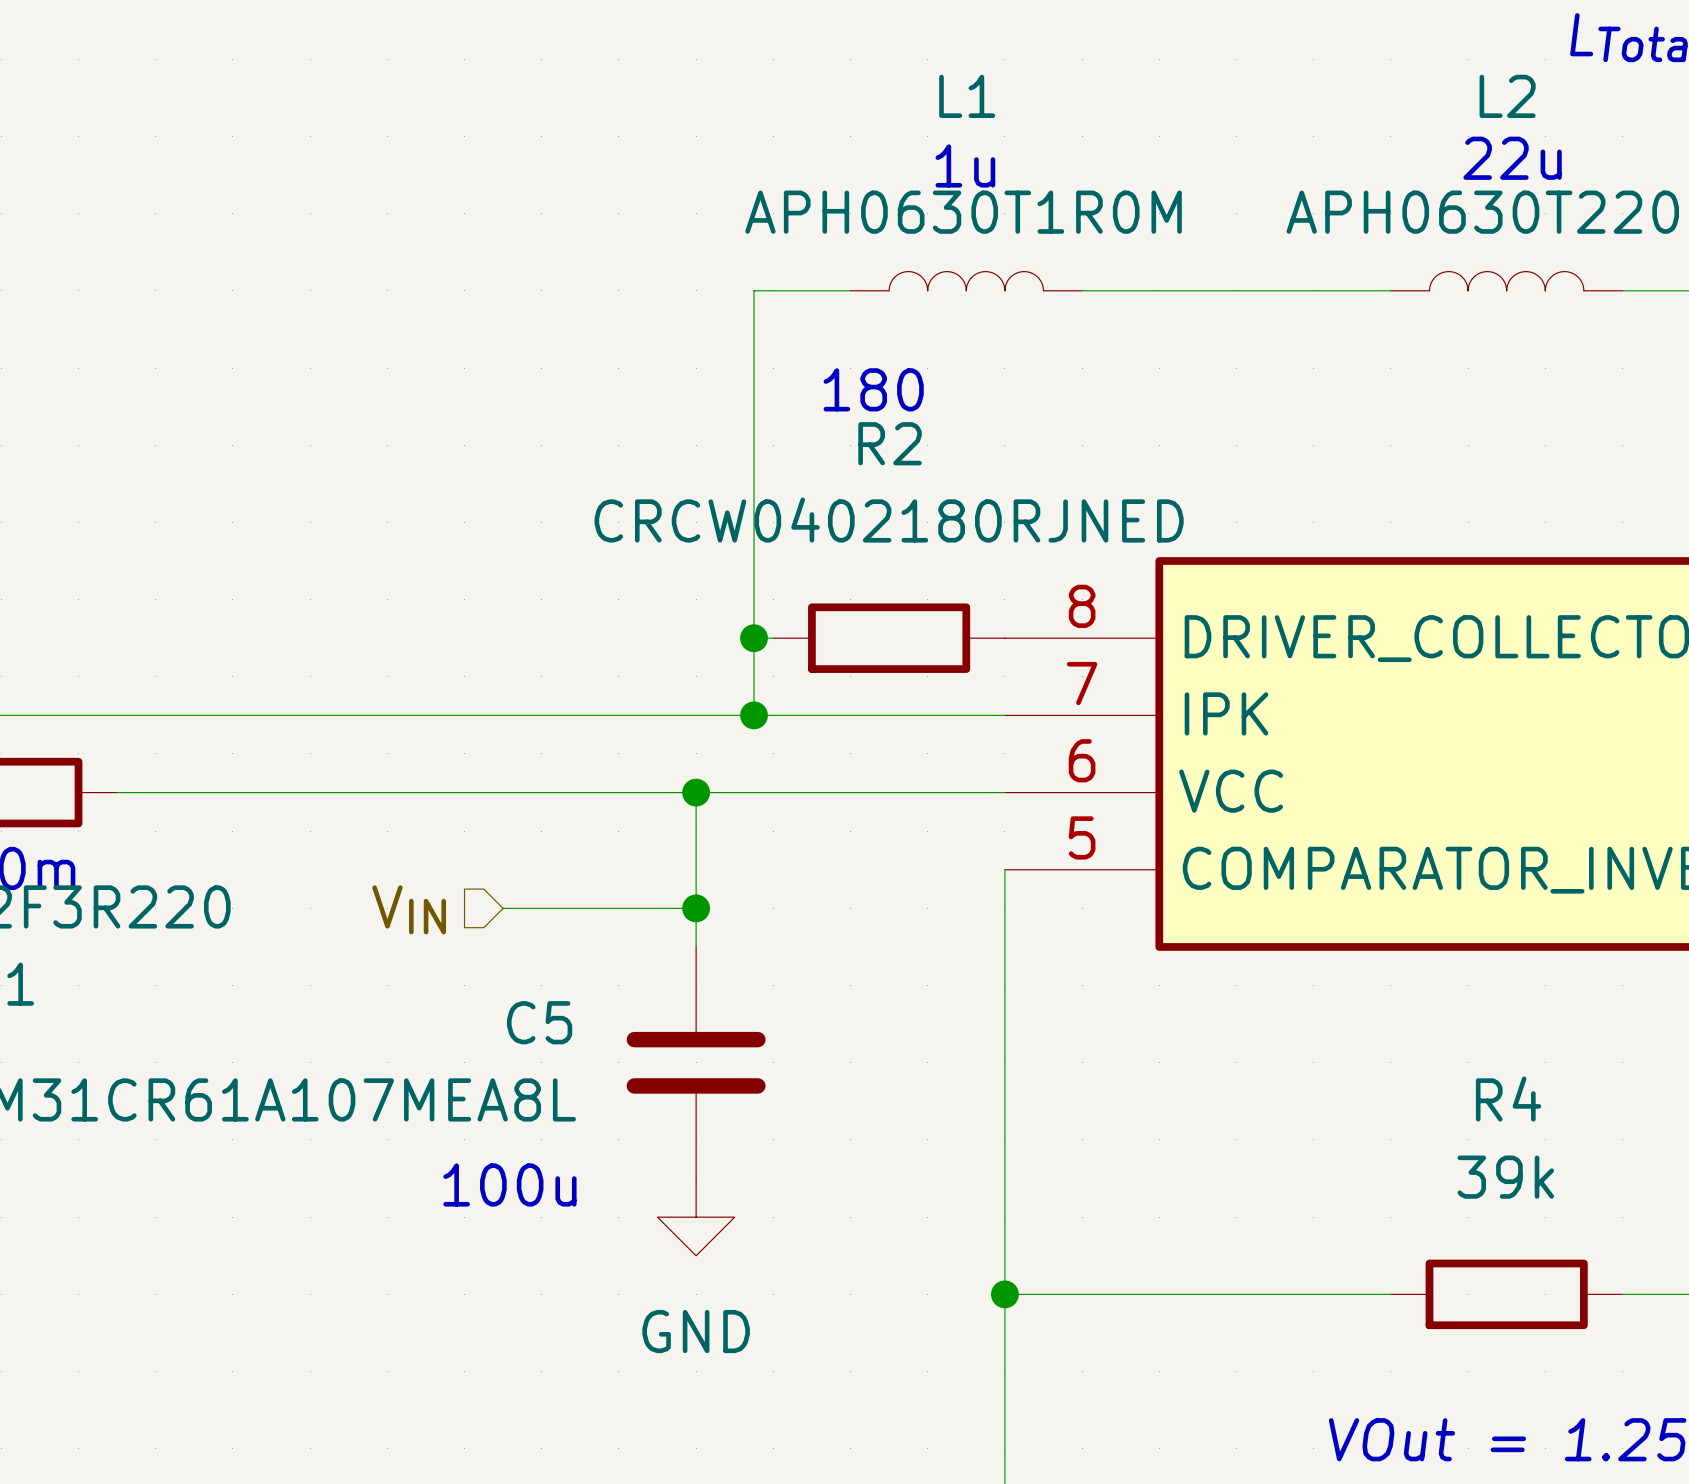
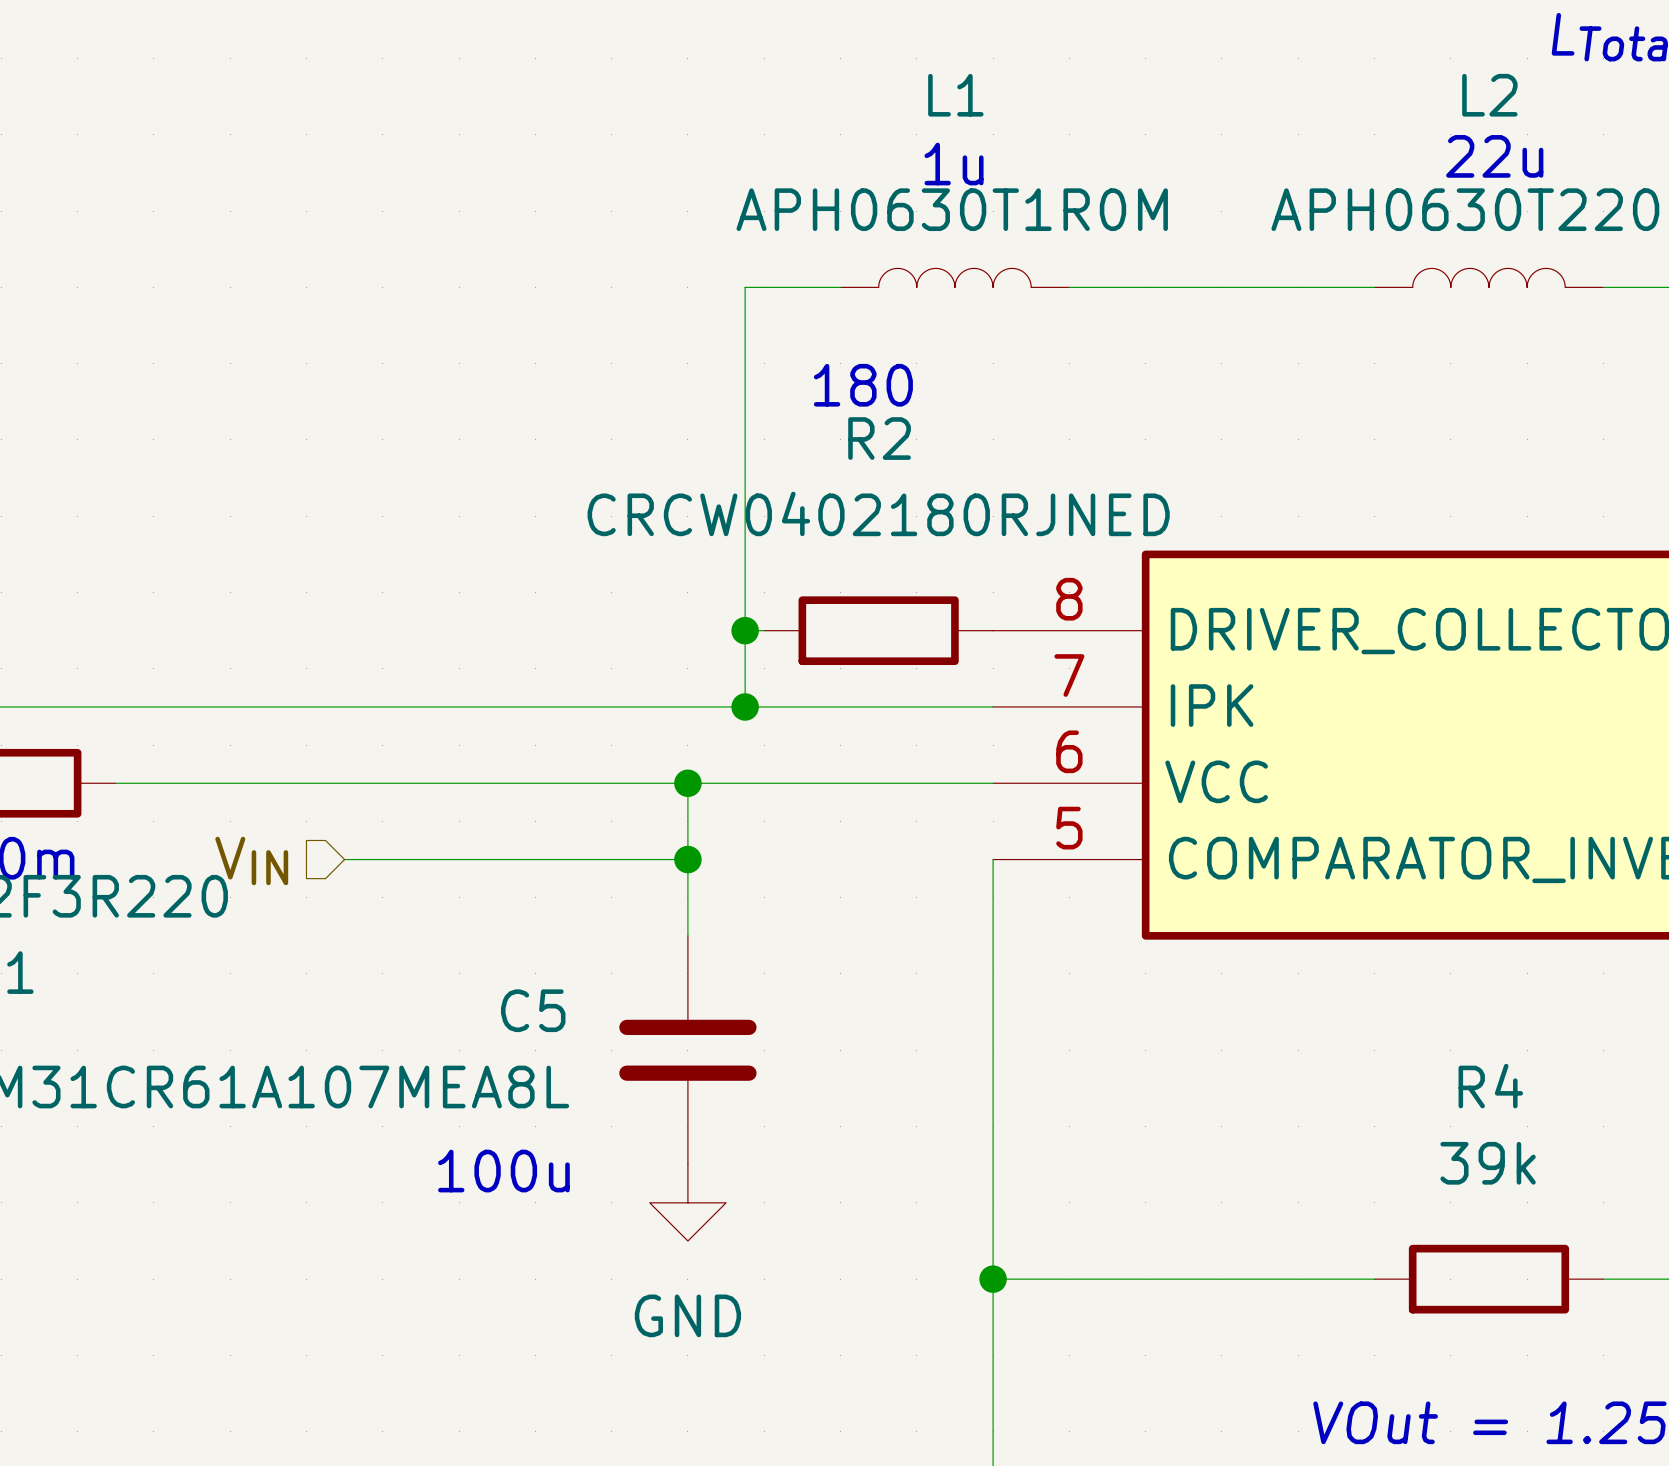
wire: none -> (344, 859) (687, 859)
wire: (503, 908) (696, 908) -> none
junction position: (696, 908) -> (687, 859)
hierarchical label position: VIN (409, 909) -> VIN (251, 860)

